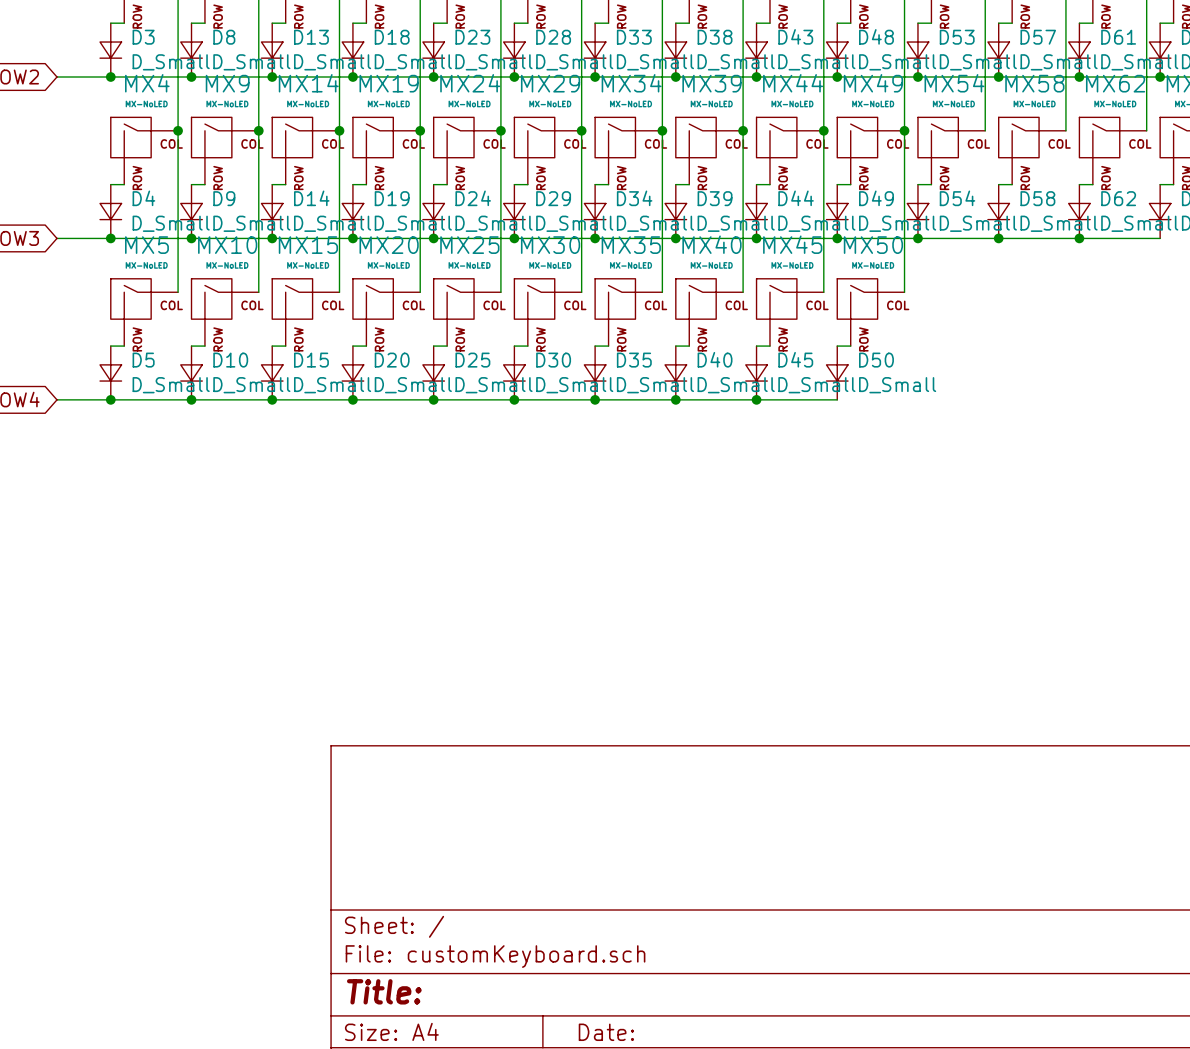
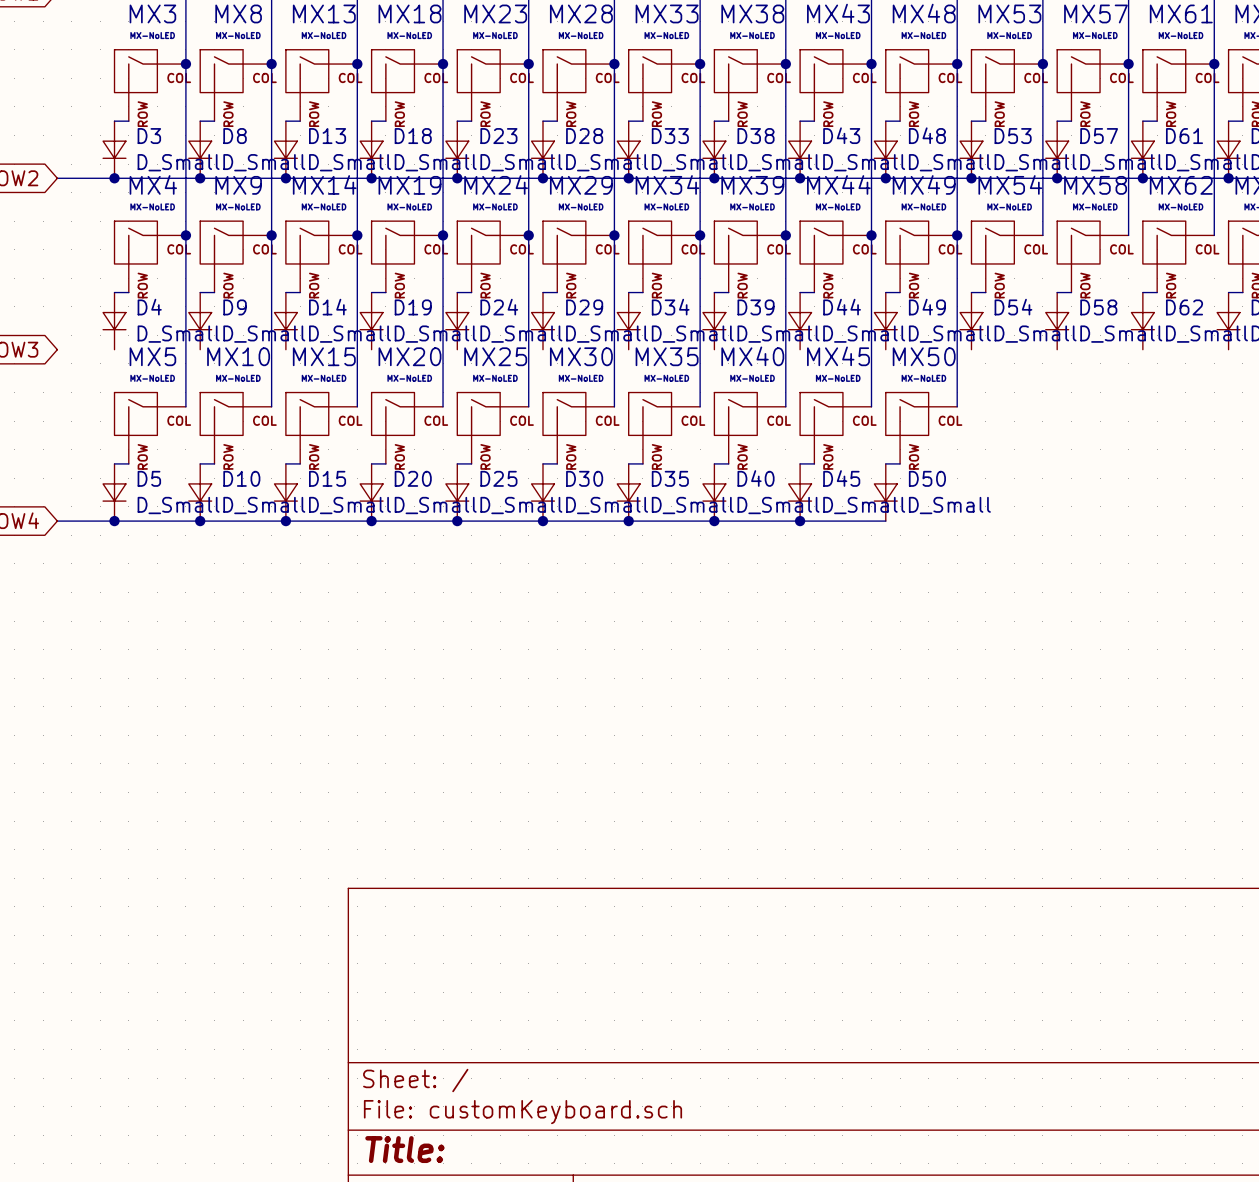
wire: (56, 238) (1160, 238) -> none
junction: (110, 238) -> none
junction: (191, 238) -> none
junction: (272, 238) -> none
junction: (352, 238) -> none
junction: (433, 238) -> none
junction: (514, 238) -> none
junction: (595, 238) -> none
junction: (675, 238) -> none
junction: (756, 238) -> none
junction: (837, 238) -> none
junction: (917, 238) -> none
junction: (998, 238) -> none
junction: (1079, 238) -> none

